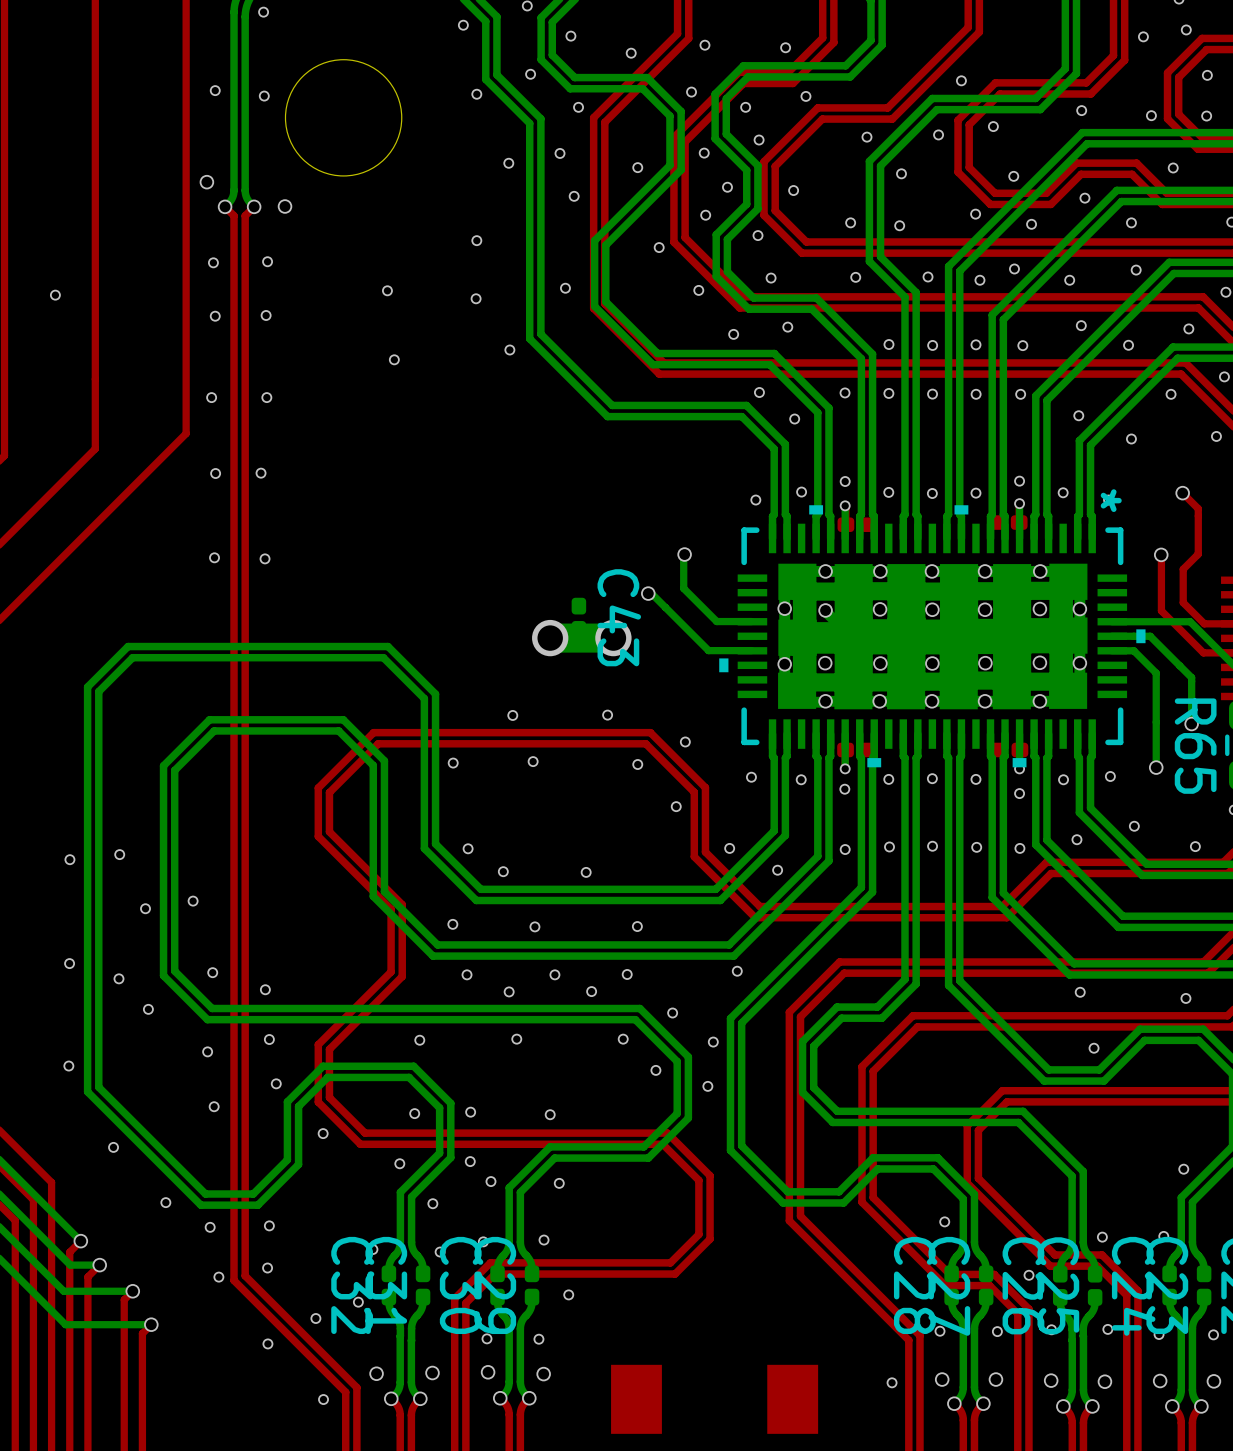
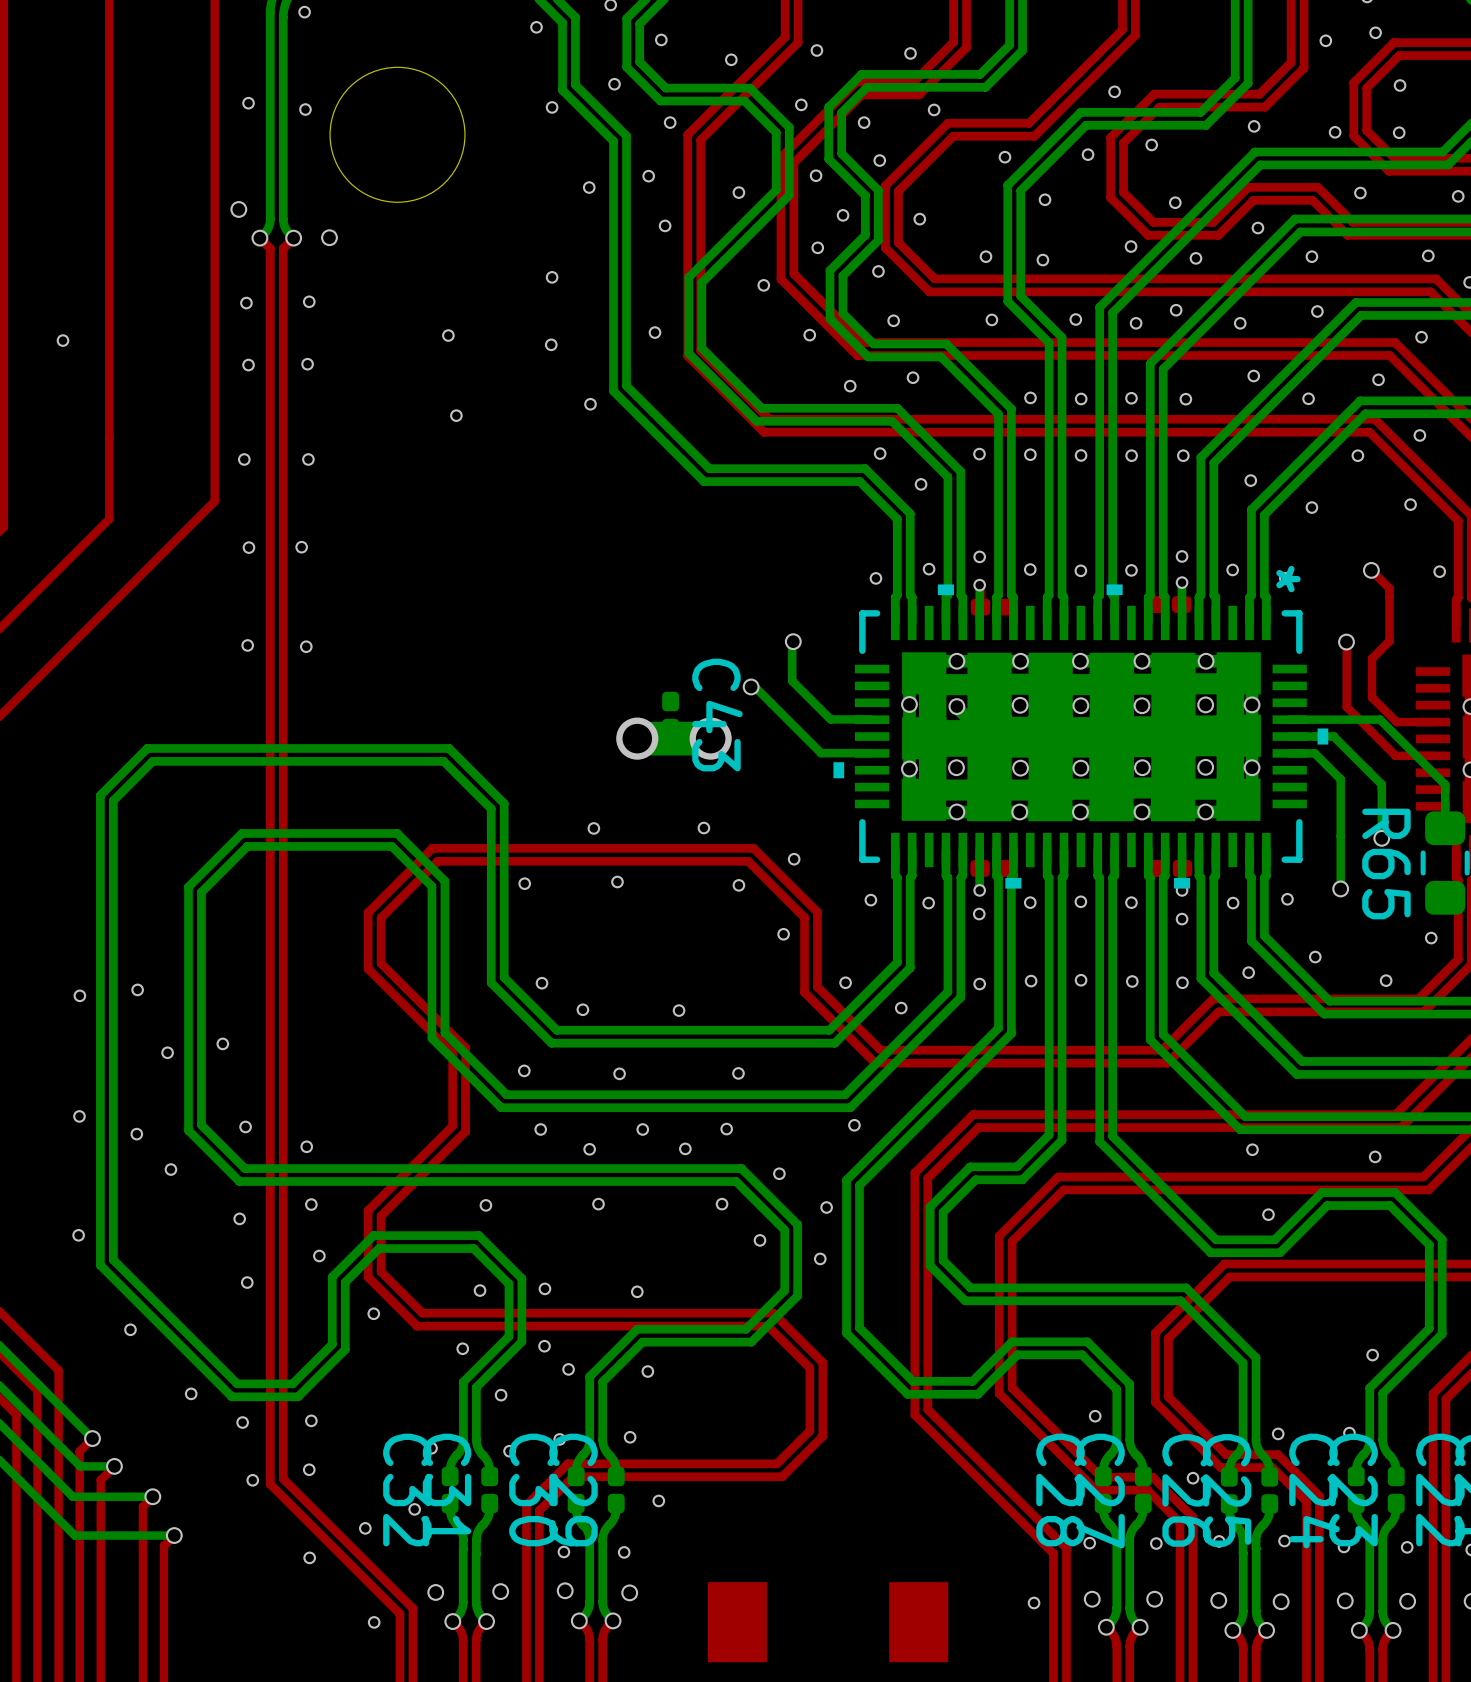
top track: (1056, 1090) (1002, 1090) (967, 1125) (967, 1183) (1050, 1266) (1052, 1266) -> (1224, 1264) (1155, 1332) (1155, 1402) (1220, 1467)
top track: (1060, 1101) (1006, 1101) (978, 1130) (978, 1178) (1055, 1254) (1057, 1254) -> (1229, 1276) (1168, 1338) (1168, 1397) (1226, 1454)

